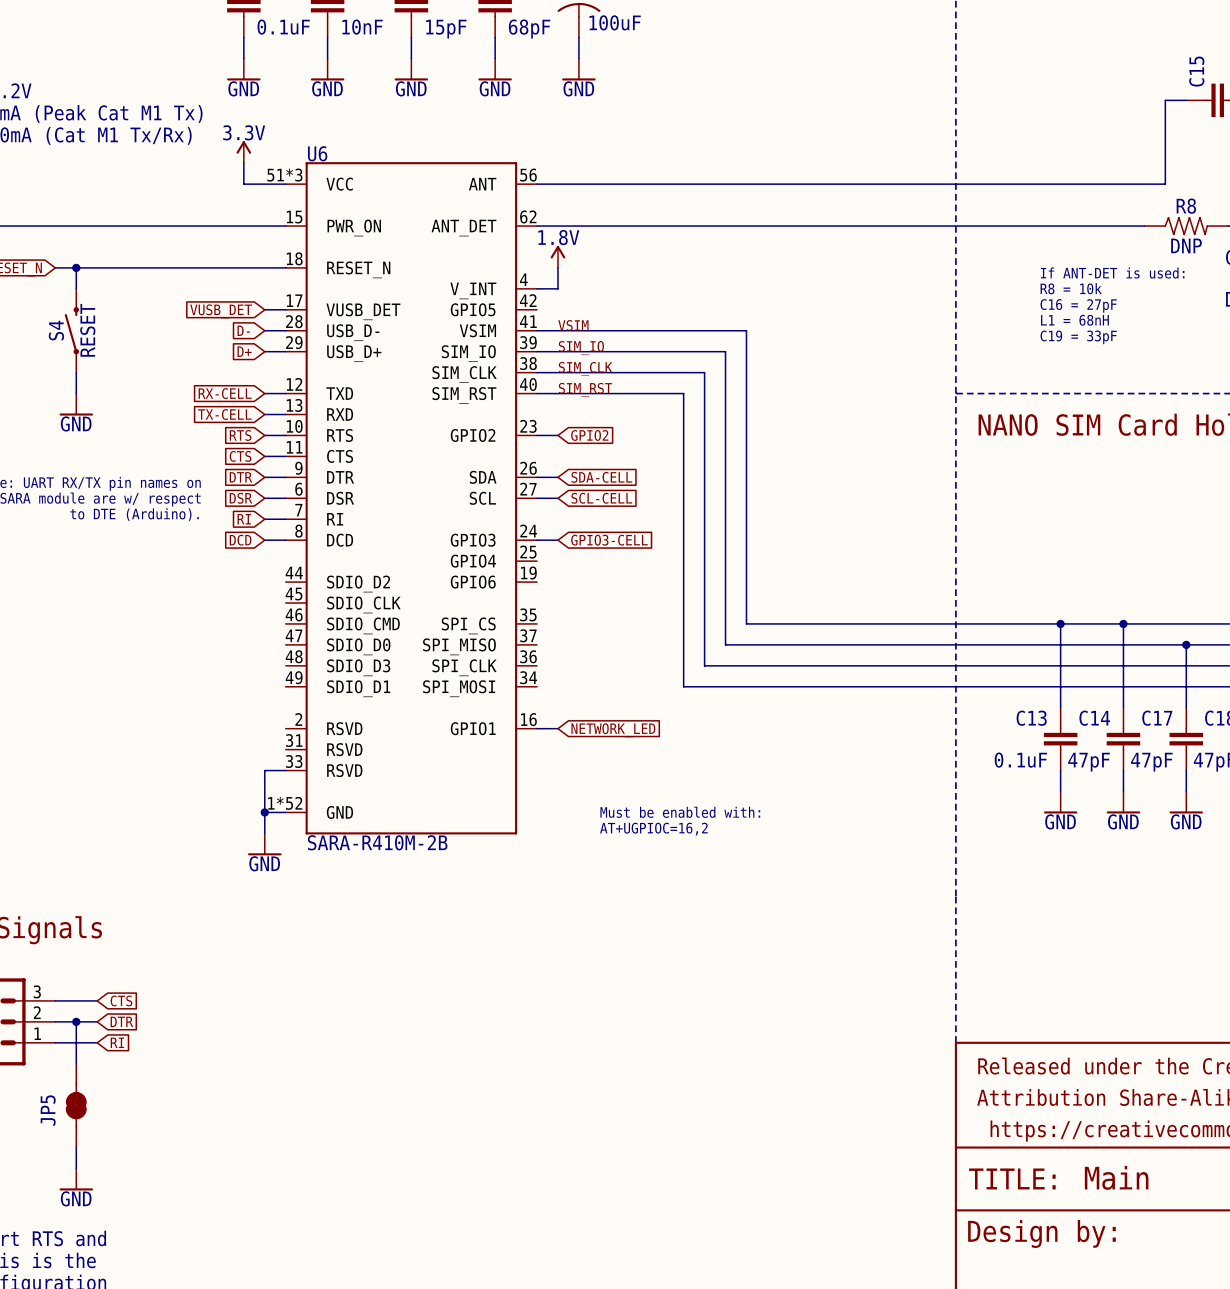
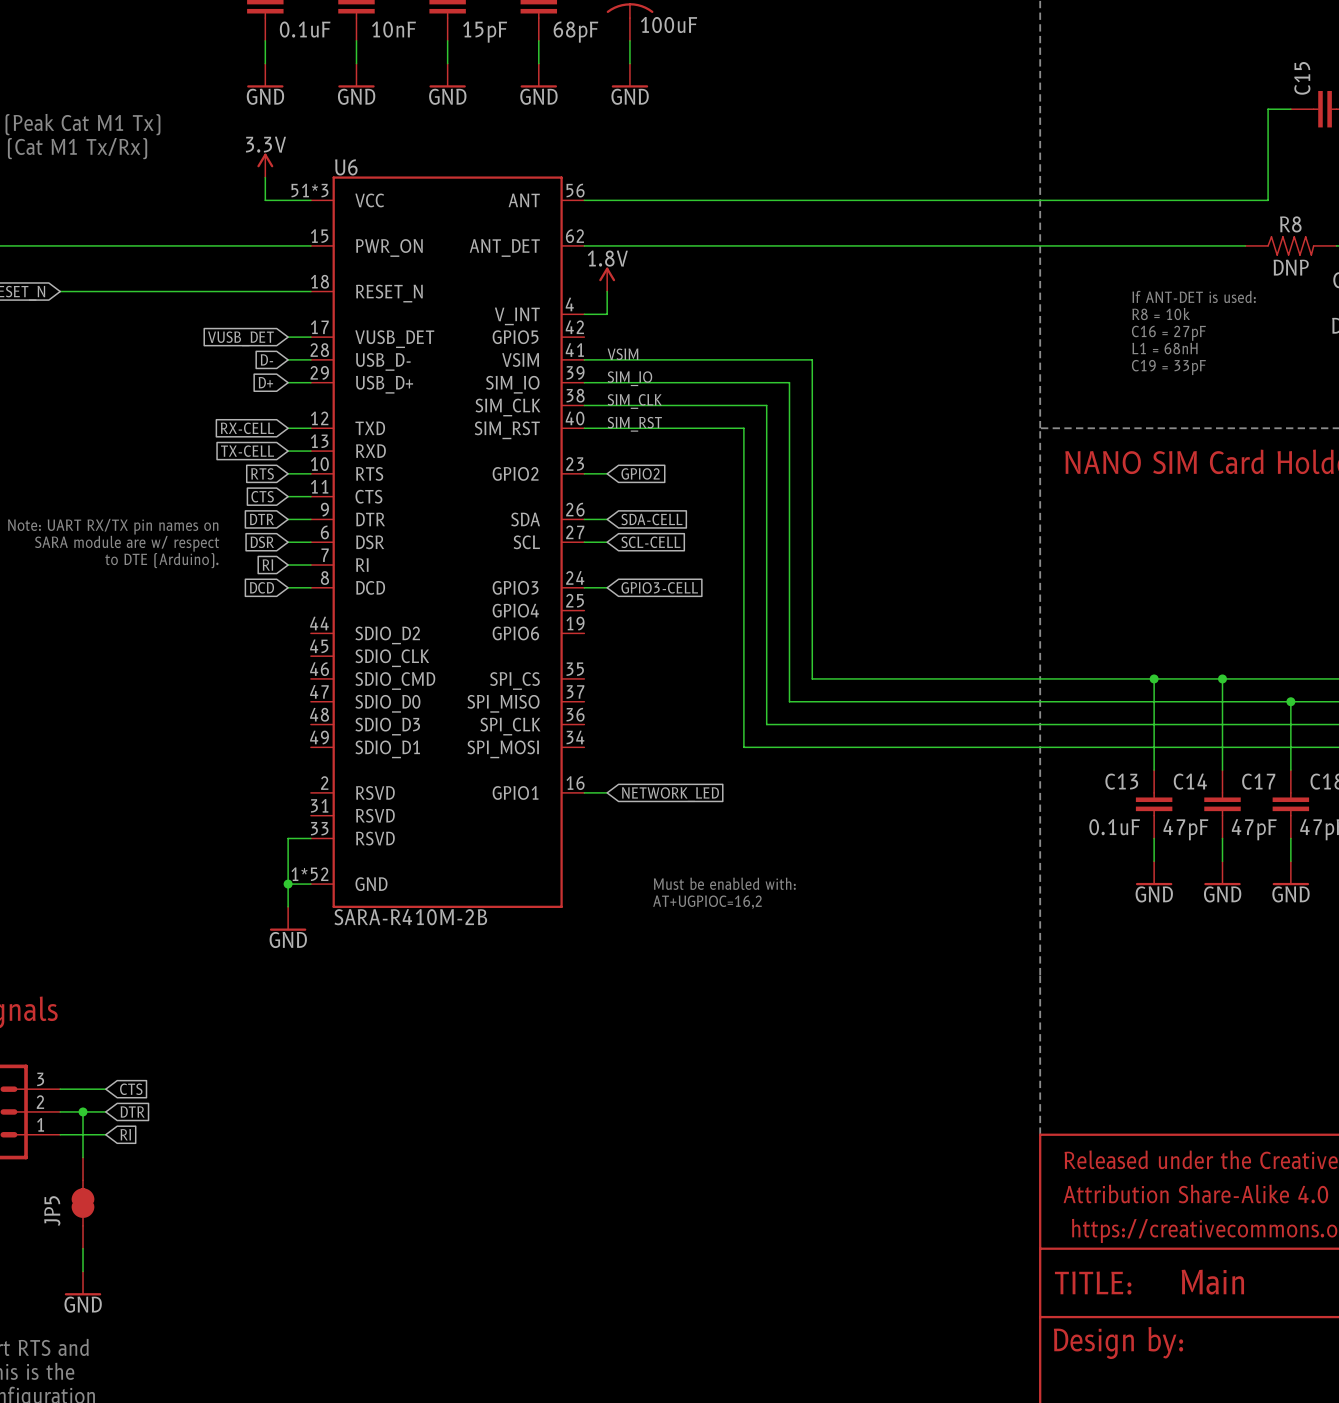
wire: (76, 267) (76, 288) -> none
junction: (76, 267) -> none
S4: RESET (71, 330) -> none
wire: (76, 372) (76, 393) -> none
power symbol: GND (76, 404) -> none

